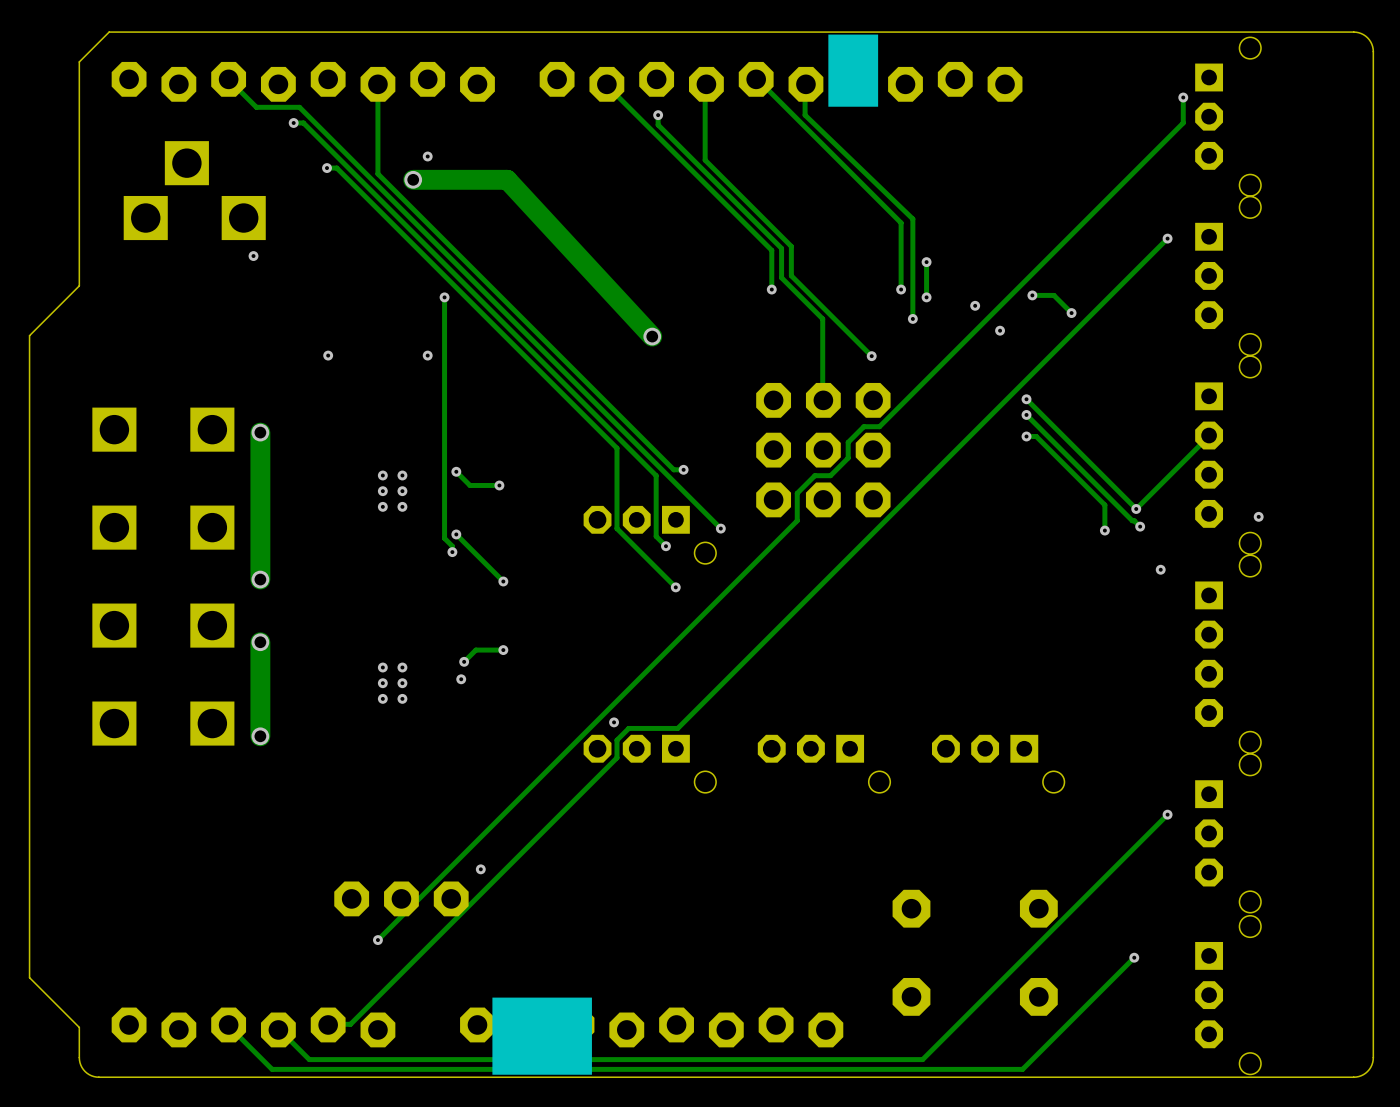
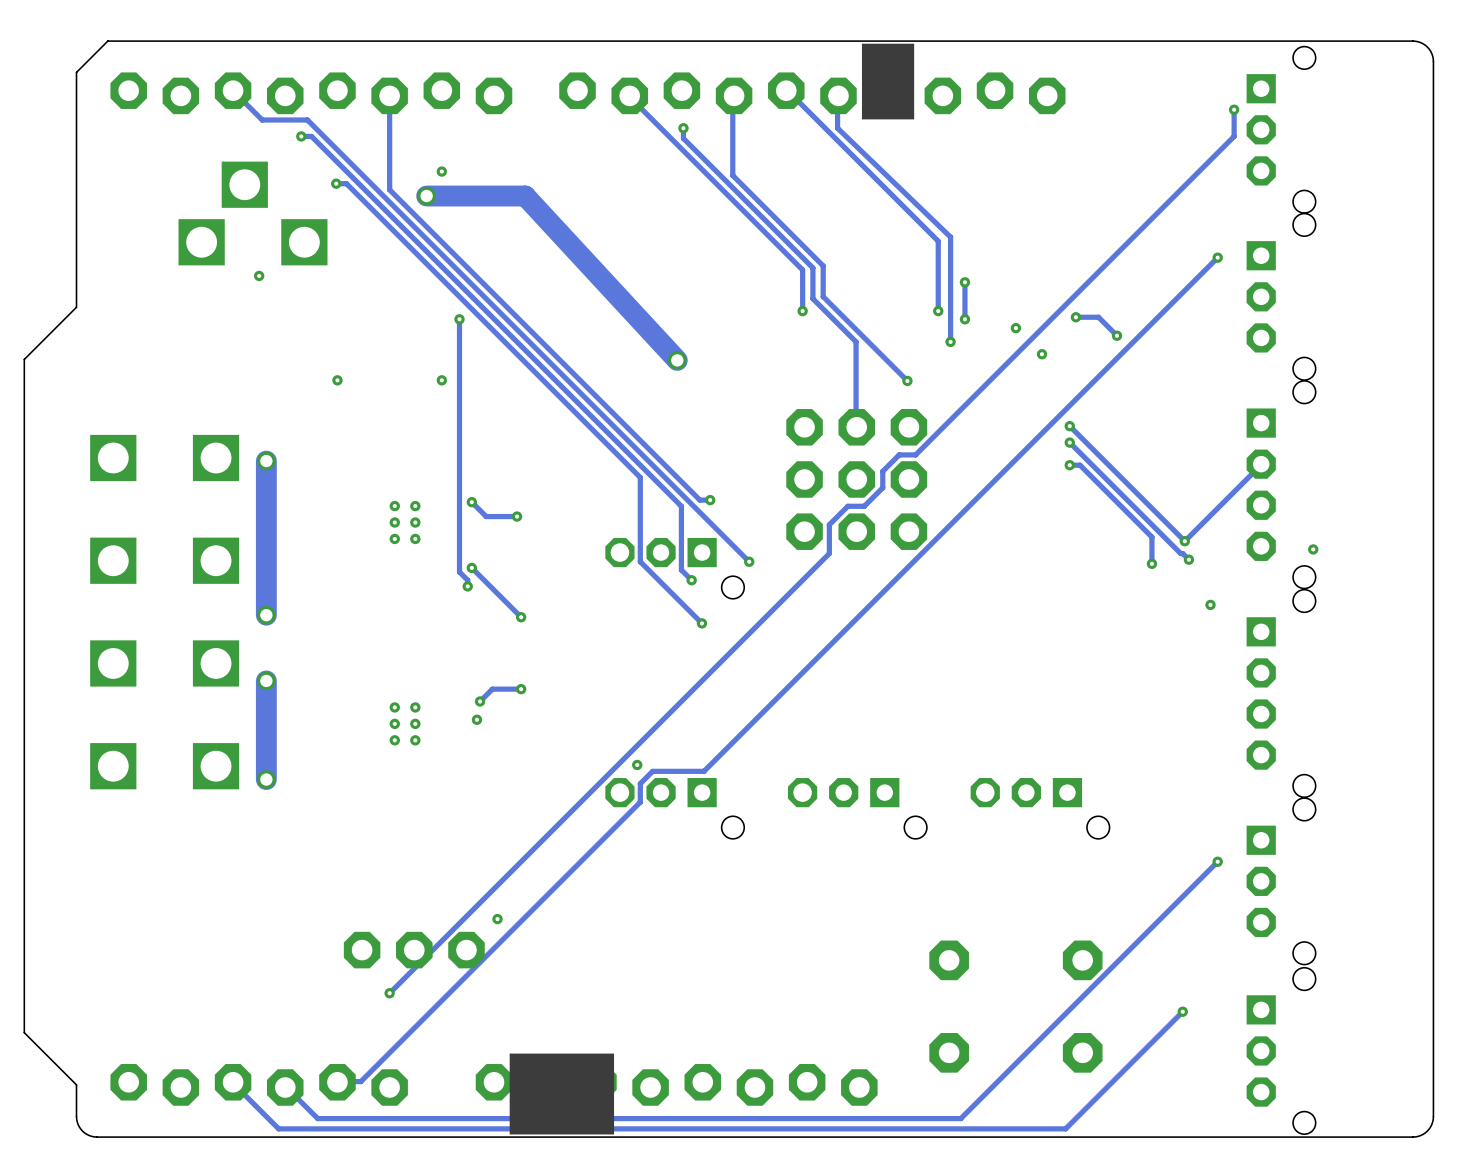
part position: (194, 190) -> (253, 213)

